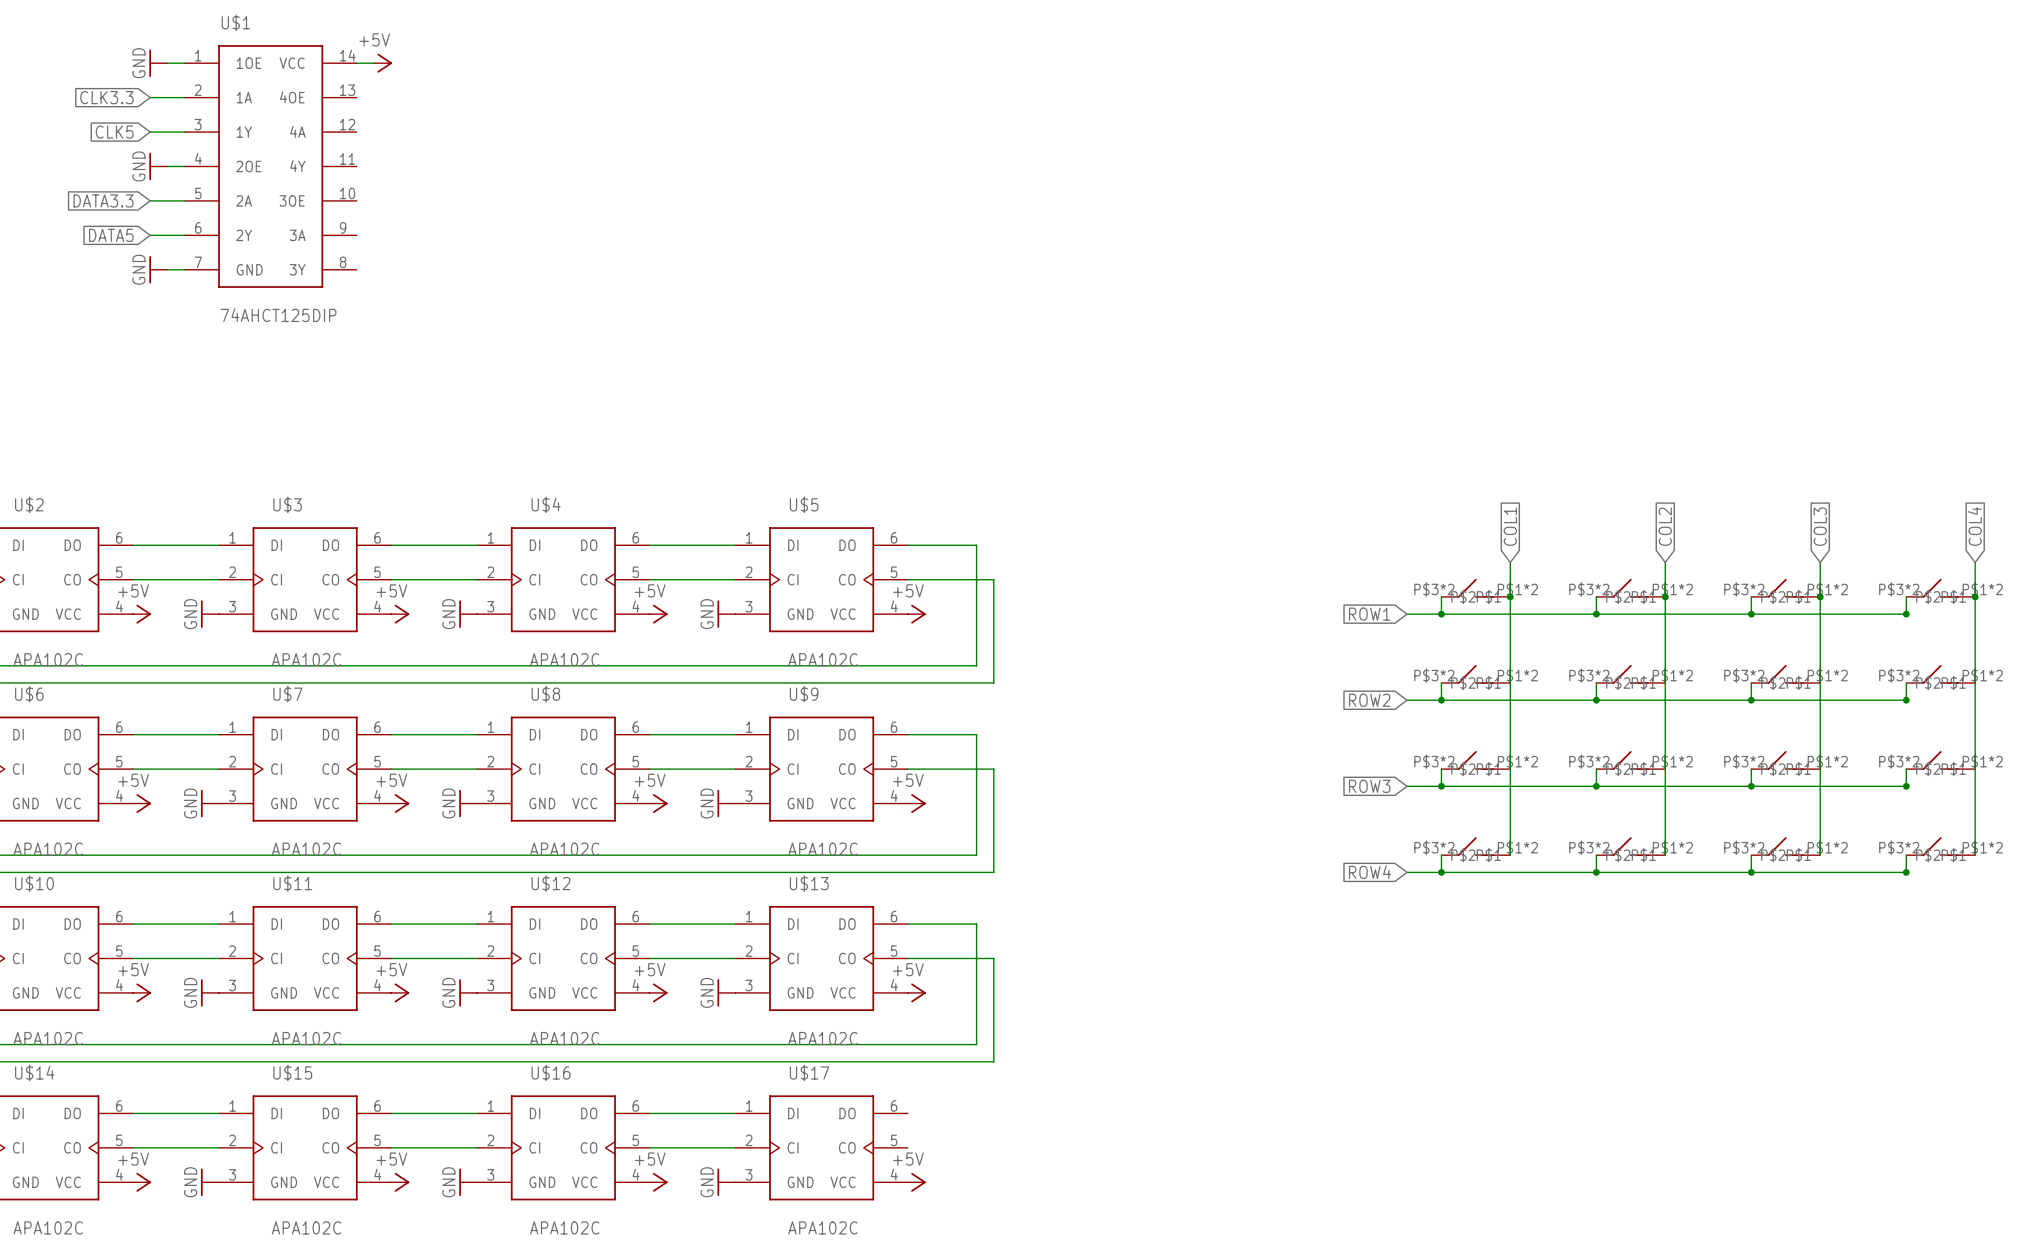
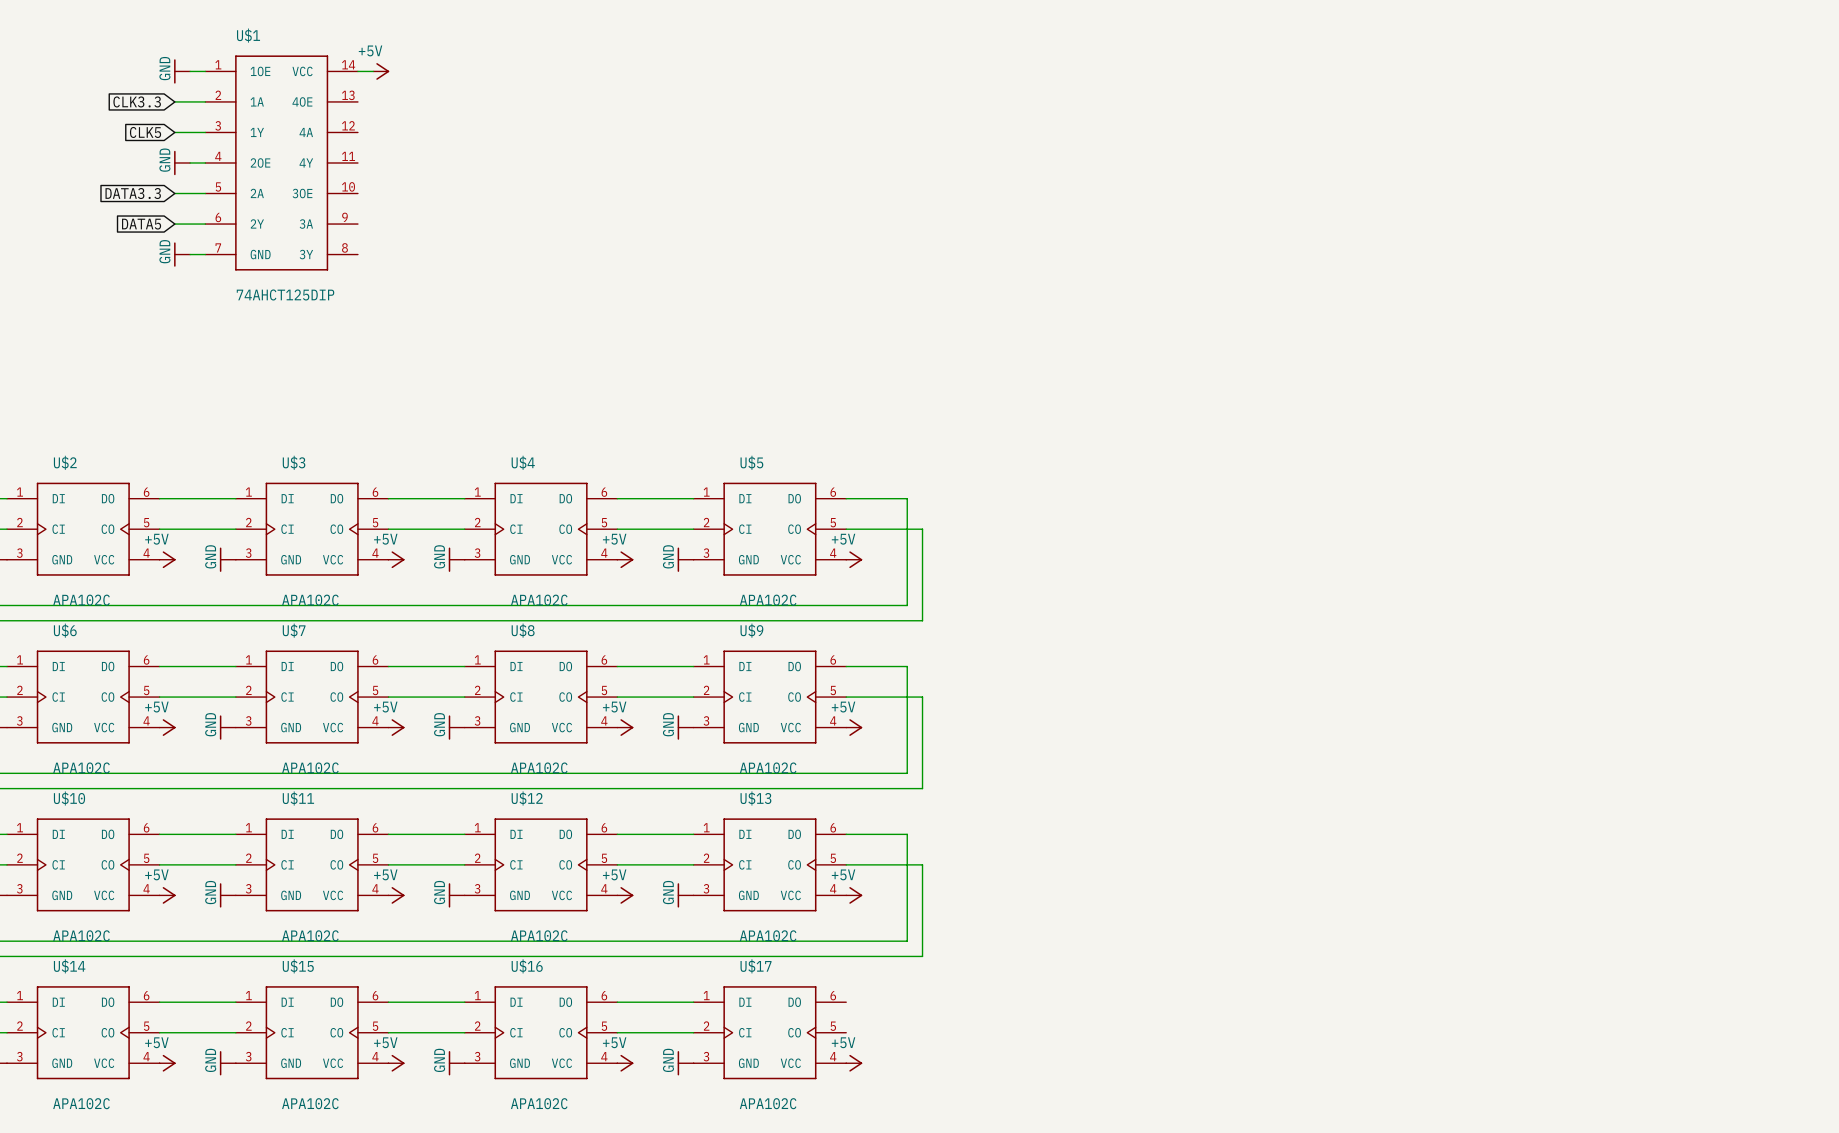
global label: COL1 (1510, 526) -> none
global label: COL2 (1665, 526) -> none
global label: COL3 (1820, 526) -> none
global label: COL4 (1974, 526) -> none
wire: (1510, 562) (1510, 855) -> none
wire: (1665, 562) (1665, 855) -> none
wire: (1820, 562) (1820, 855) -> none
wire: (1975, 562) (1975, 855) -> none
part: (1475, 588) -> none
part: (1630, 588) -> none
part: (1785, 588) -> none
part: (1940, 588) -> none
wire: (1441, 596) (1441, 614) -> none
junction: (1510, 596) -> none
wire: (1596, 596) (1596, 614) -> none
junction: (1665, 596) -> none
wire: (1751, 596) (1751, 614) -> none
junction: (1820, 596) -> none
wire: (1906, 596) (1906, 614) (1407, 614) -> none
junction: (1975, 596) -> none
global label: ROW1 (1369, 614) -> none
junction: (1441, 614) -> none
junction: (1596, 614) -> none
junction: (1751, 614) -> none
junction: (1906, 614) -> none
part: (1475, 674) -> none
part: (1630, 674) -> none
part: (1785, 674) -> none
part: (1940, 674) -> none
wire: (1441, 683) (1441, 700) -> none
wire: (1596, 683) (1596, 700) -> none
wire: (1751, 683) (1751, 700) -> none
wire: (1906, 683) (1906, 700) (1407, 700) -> none
global label: ROW2 (1369, 700) -> none
junction: (1441, 700) -> none
junction: (1596, 700) -> none
junction: (1751, 700) -> none
junction: (1906, 700) -> none
part: (1475, 760) -> none
part: (1630, 760) -> none
part: (1785, 760) -> none
part: (1940, 760) -> none
wire: (1441, 769) (1441, 786) -> none
wire: (1596, 769) (1596, 786) -> none
wire: (1751, 769) (1751, 786) -> none
wire: (1906, 769) (1906, 786) (1407, 786) -> none
global label: ROW3 (1369, 786) -> none
junction: (1441, 786) -> none
junction: (1596, 786) -> none
junction: (1751, 786) -> none
junction: (1906, 786) -> none
part: (1475, 846) -> none
part: (1630, 846) -> none
part: (1785, 846) -> none
part: (1940, 846) -> none
wire: (1441, 855) (1441, 872) -> none
wire: (1596, 855) (1596, 872) -> none
wire: (1751, 855) (1751, 872) -> none
wire: (1906, 855) (1906, 872) (1407, 872) -> none
global label: ROW4 (1369, 872) -> none
junction: (1441, 872) -> none
junction: (1596, 872) -> none
junction: (1751, 872) -> none
junction: (1906, 872) -> none

